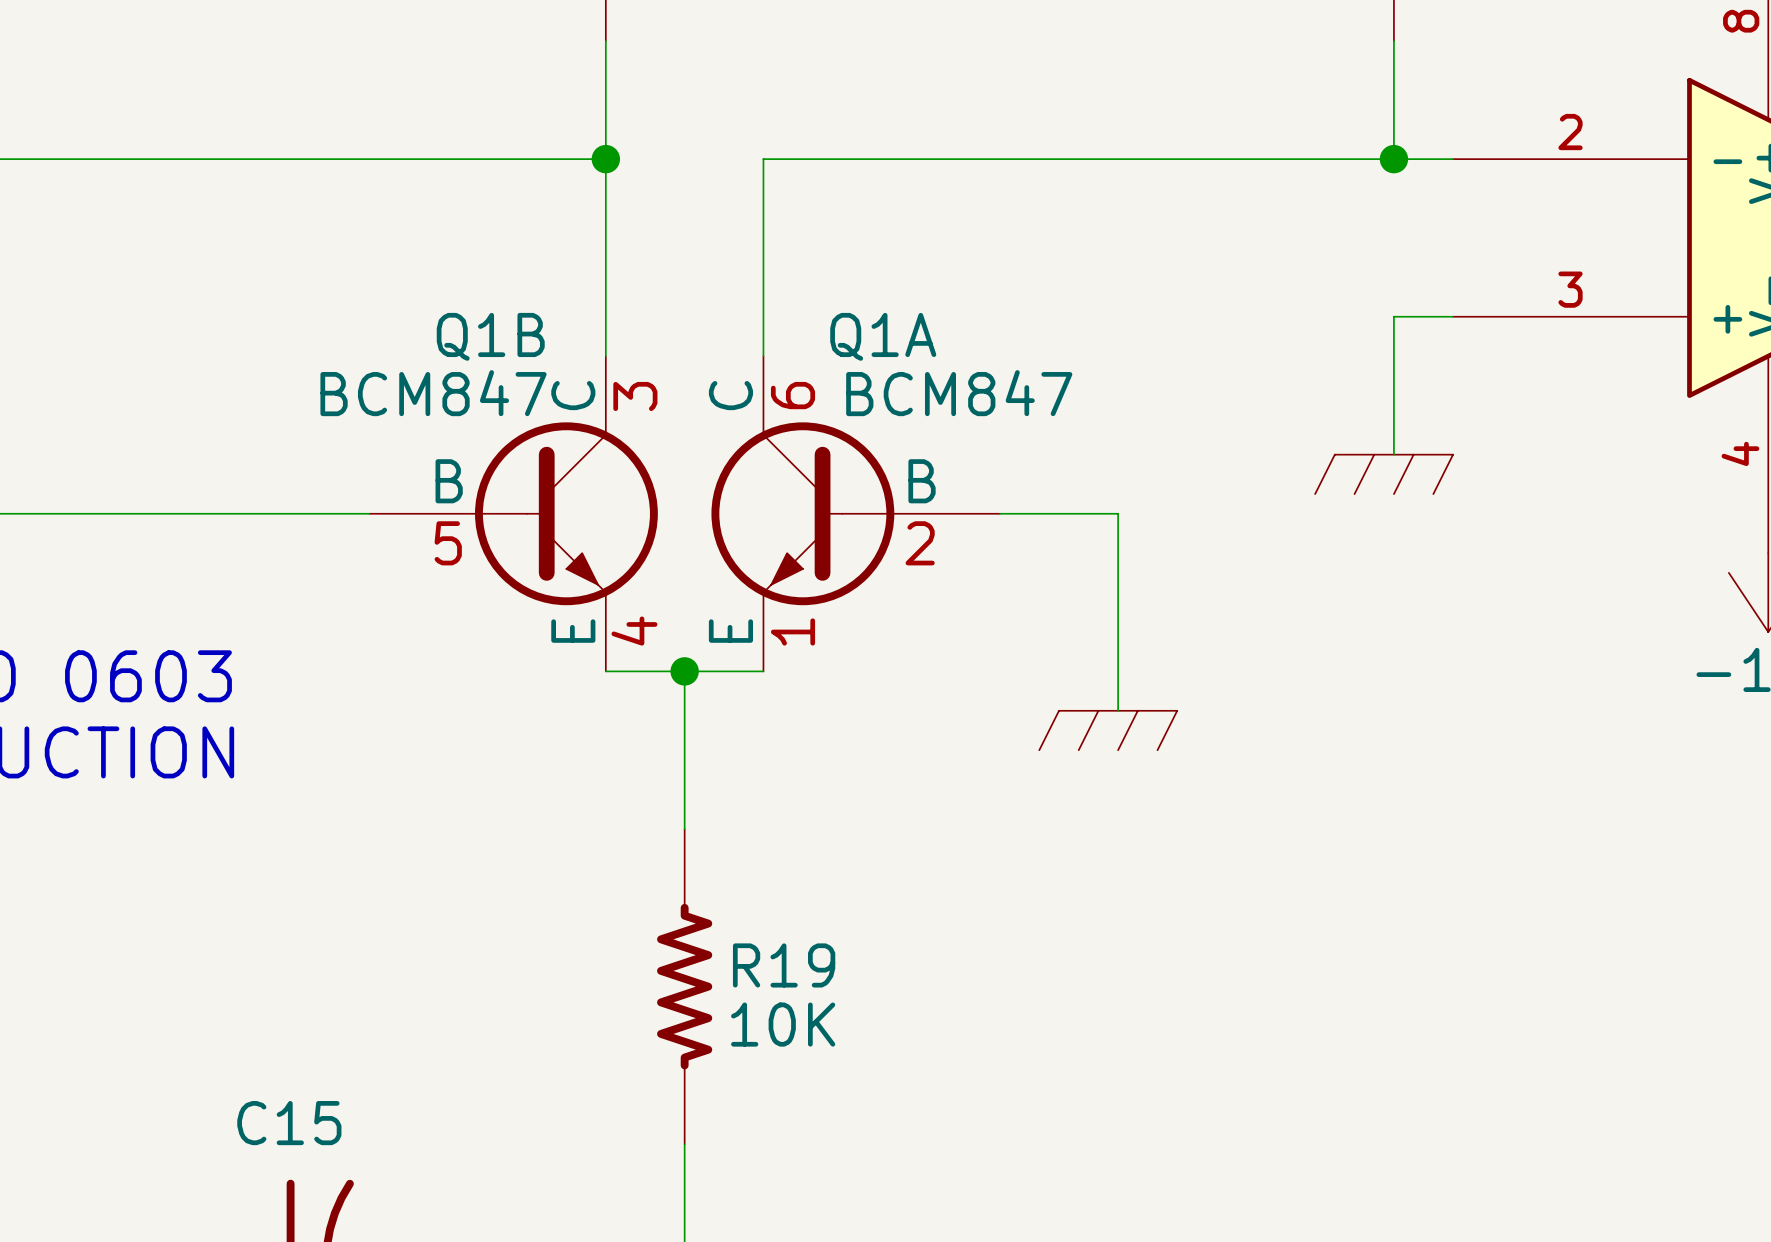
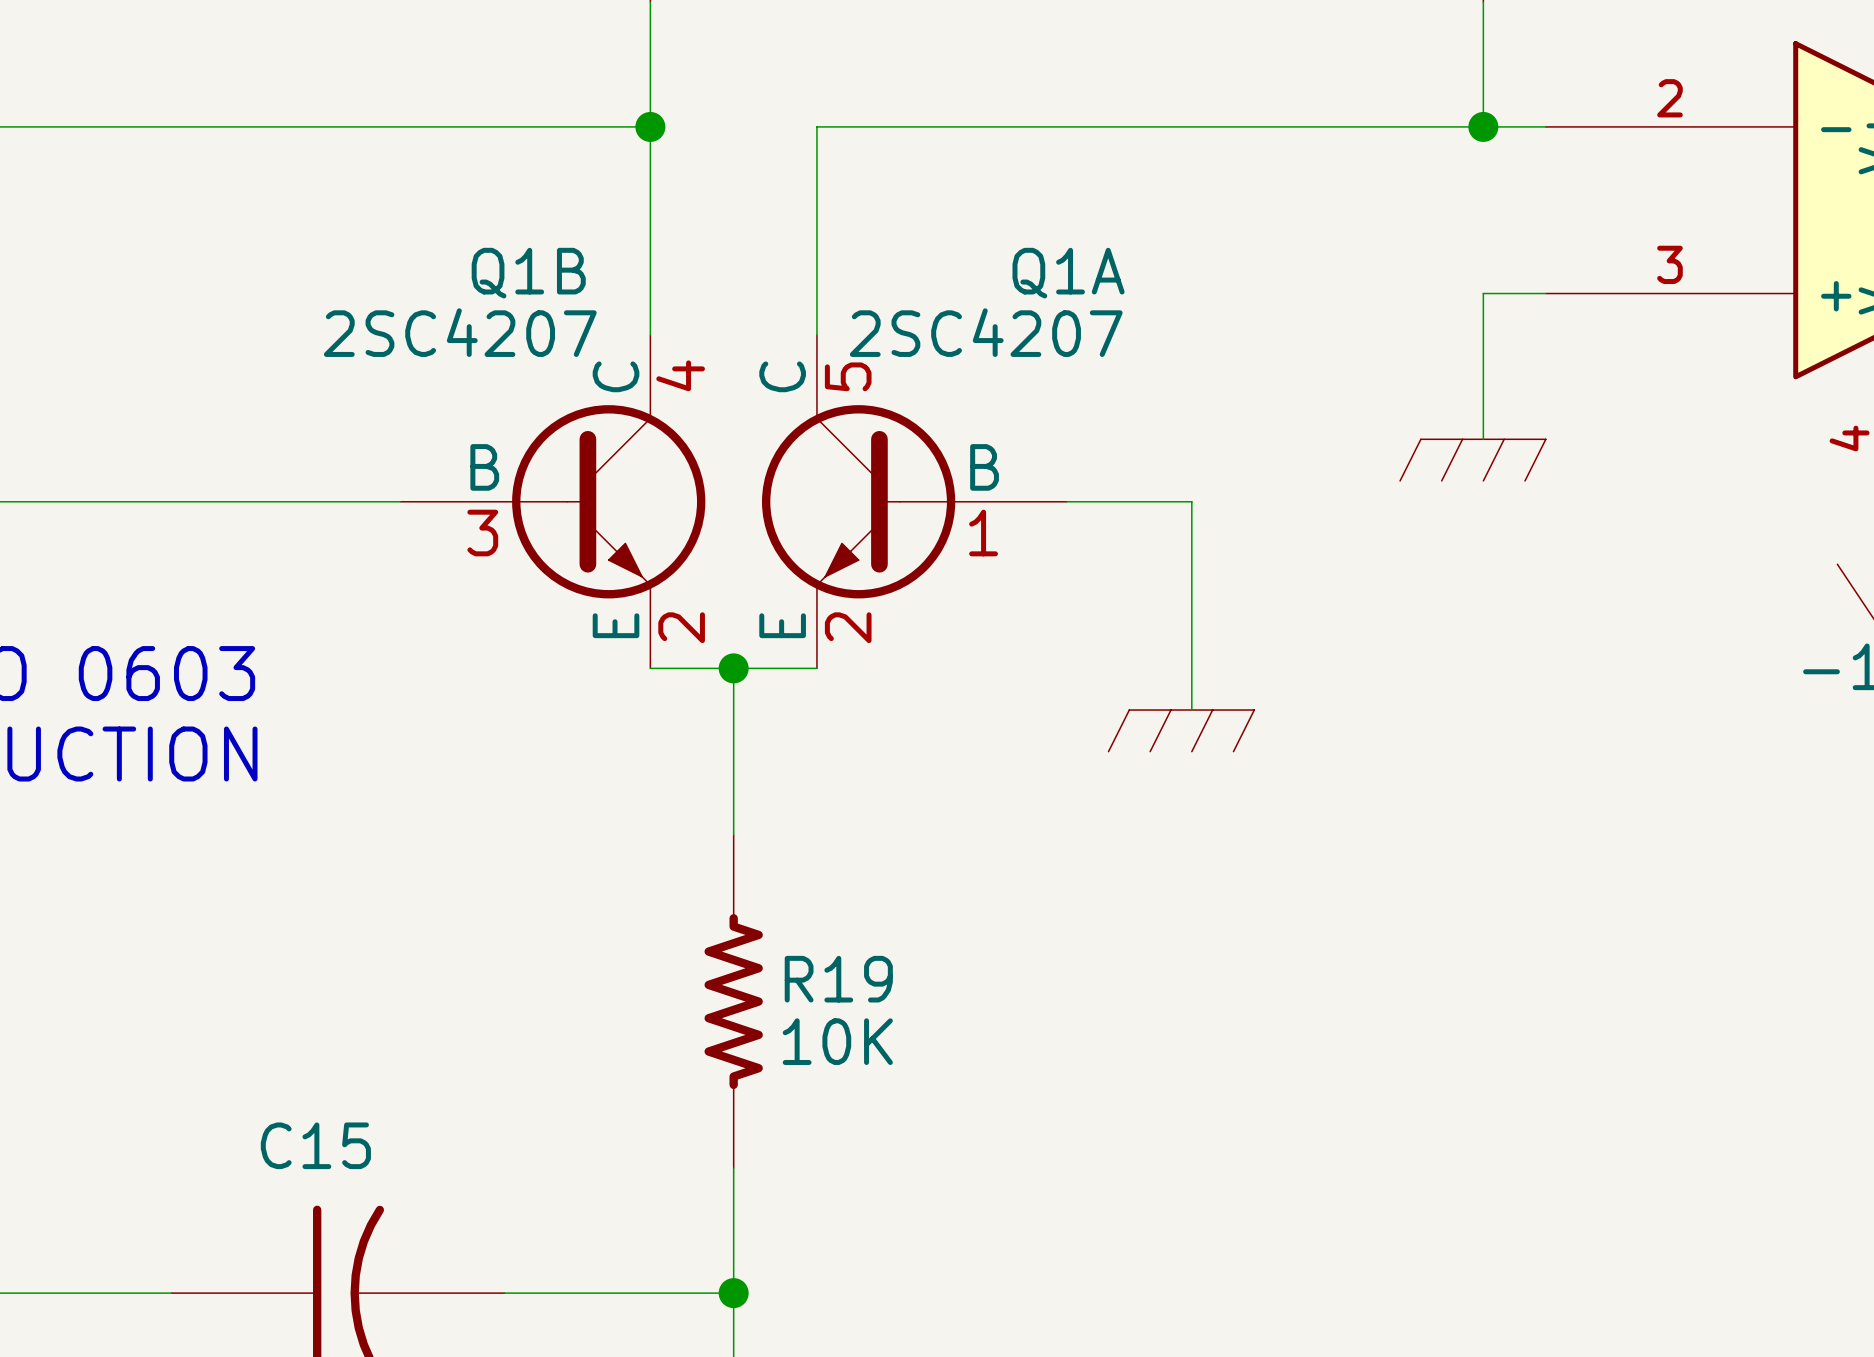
Q1B name position: Q1B (490, 336) -> Q1B (528, 273)
Q1A name position: Q1A (883, 336) -> Q1A (1068, 273)
Q1B value: BCM847 (433, 393) -> 2SC4207 (460, 332)
Q1A value: BCM847 (959, 393) -> 2SC4207 (986, 332)
Q1A pin number: 6 (793, 395) -> 5 (848, 376)
Q1B pin number: 3 (635, 396) -> 4 (680, 375)
Q1B pin number: 5 (448, 543) -> 3 (482, 533)
Q1A pin number: 2 (920, 543) -> 1 (983, 533)
Q1B pin number: 4 (634, 631) -> 2 (681, 627)
Q1A pin number: 1 (793, 631) -> 2 (848, 627)

